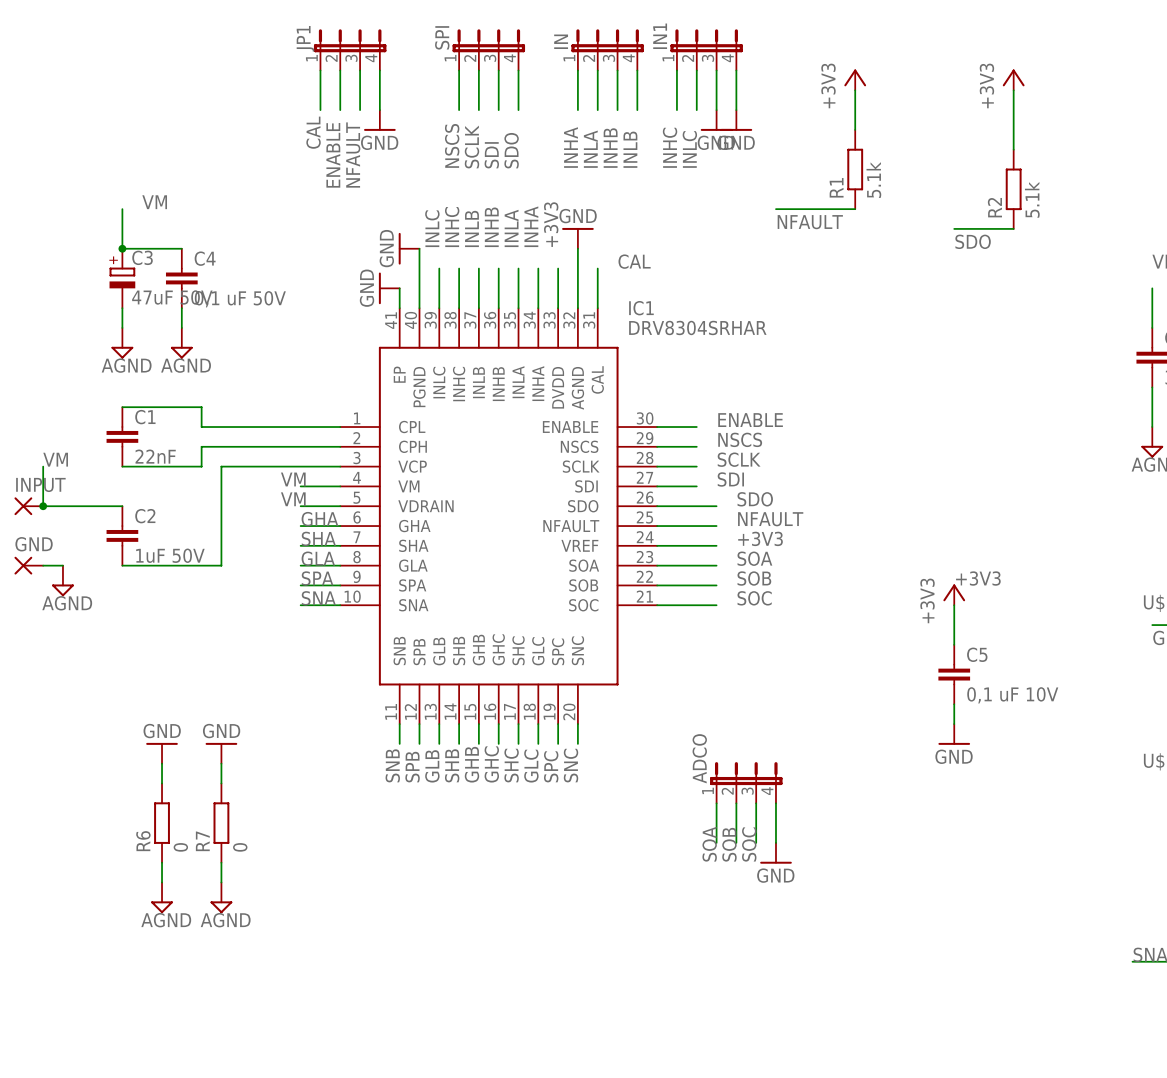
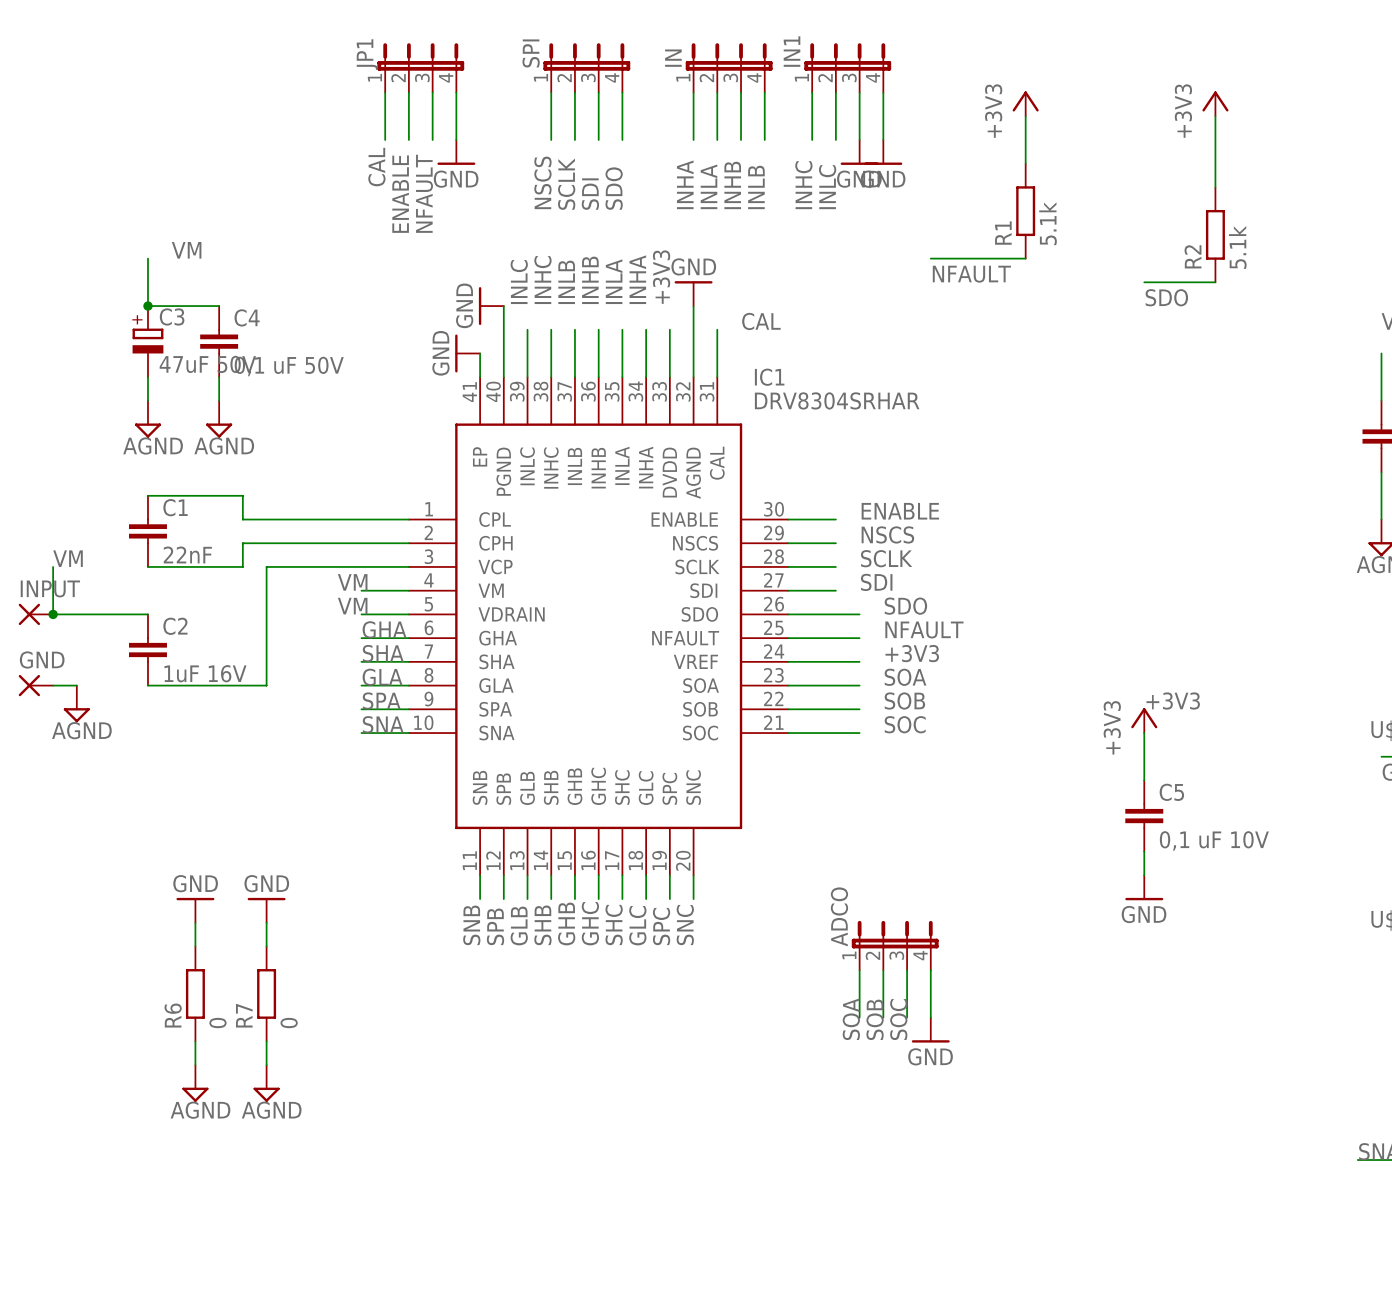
C2 value: 1uF 50V (170, 555) -> 1uF 16V (205, 673)

